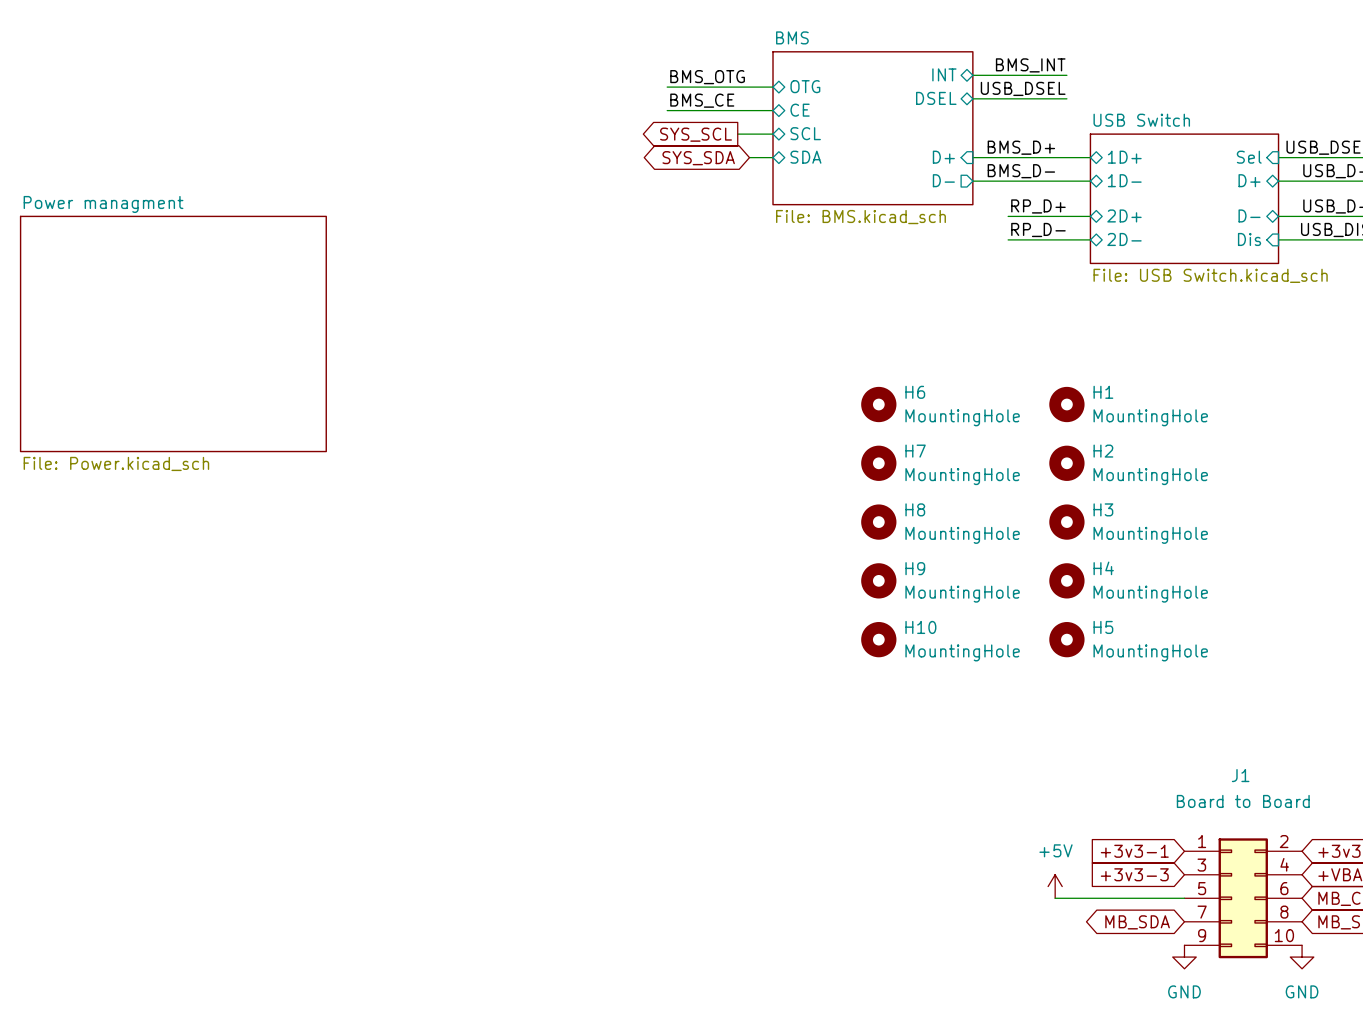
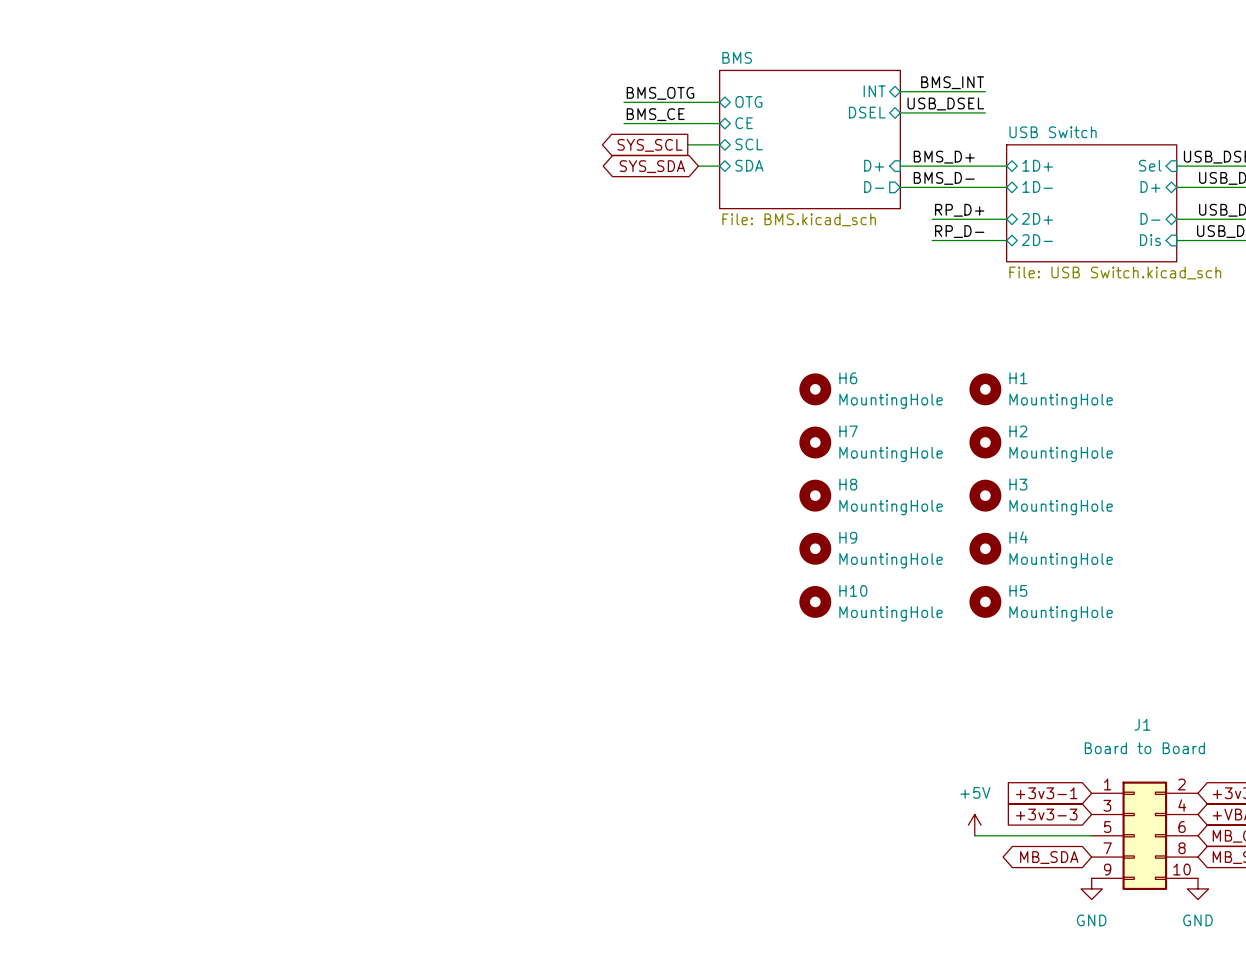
sheet Power managment: File: Power.kicad_sch (173, 333) -> none

